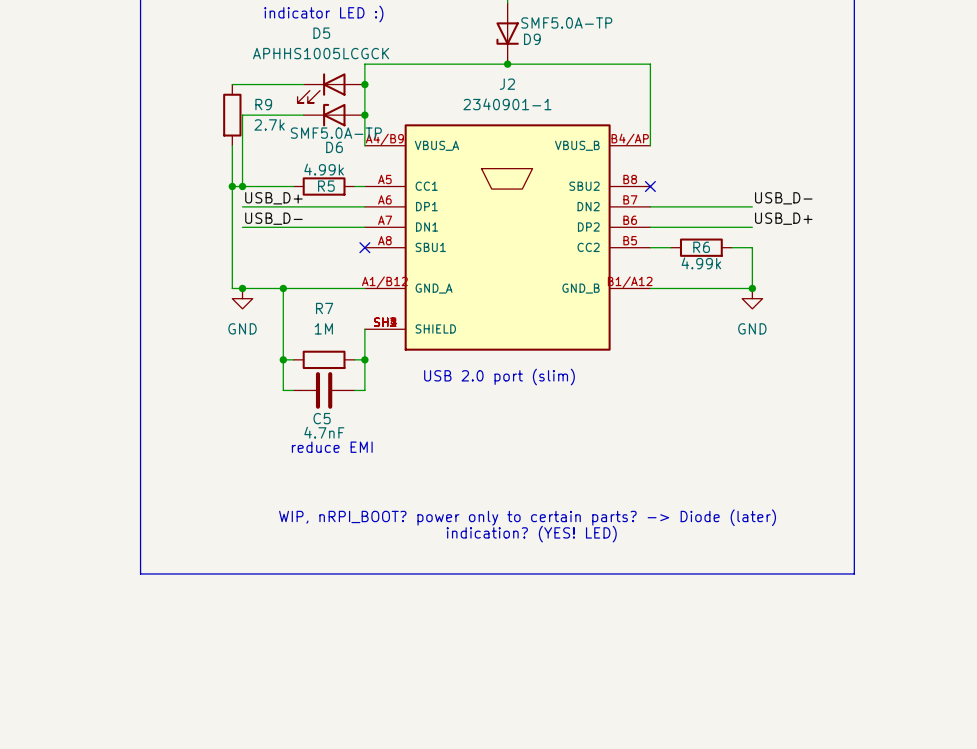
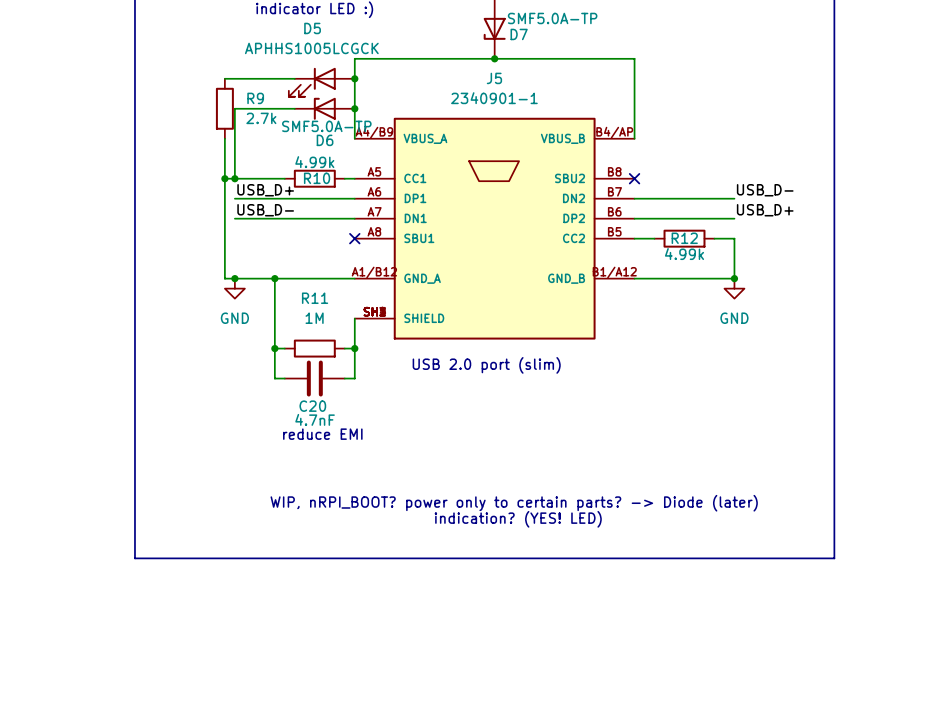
D9 name: D9 (532, 39) -> D7 (519, 34)
J2 name: J2 (507, 84) -> J5 (494, 78)
R5 name: R5 (326, 186) -> R10 (317, 178)
R6 name: R6 (701, 247) -> R12 (684, 238)
R7 name: R7 (324, 308) -> R11 (315, 298)
C5 name: C5 (322, 418) -> C20 (312, 406)

